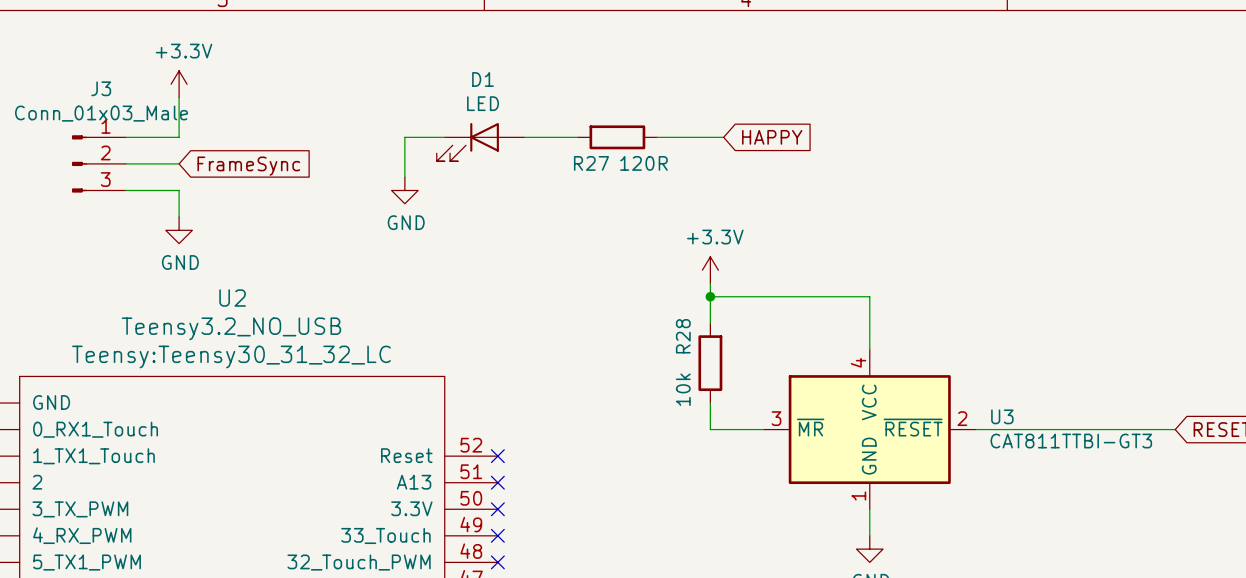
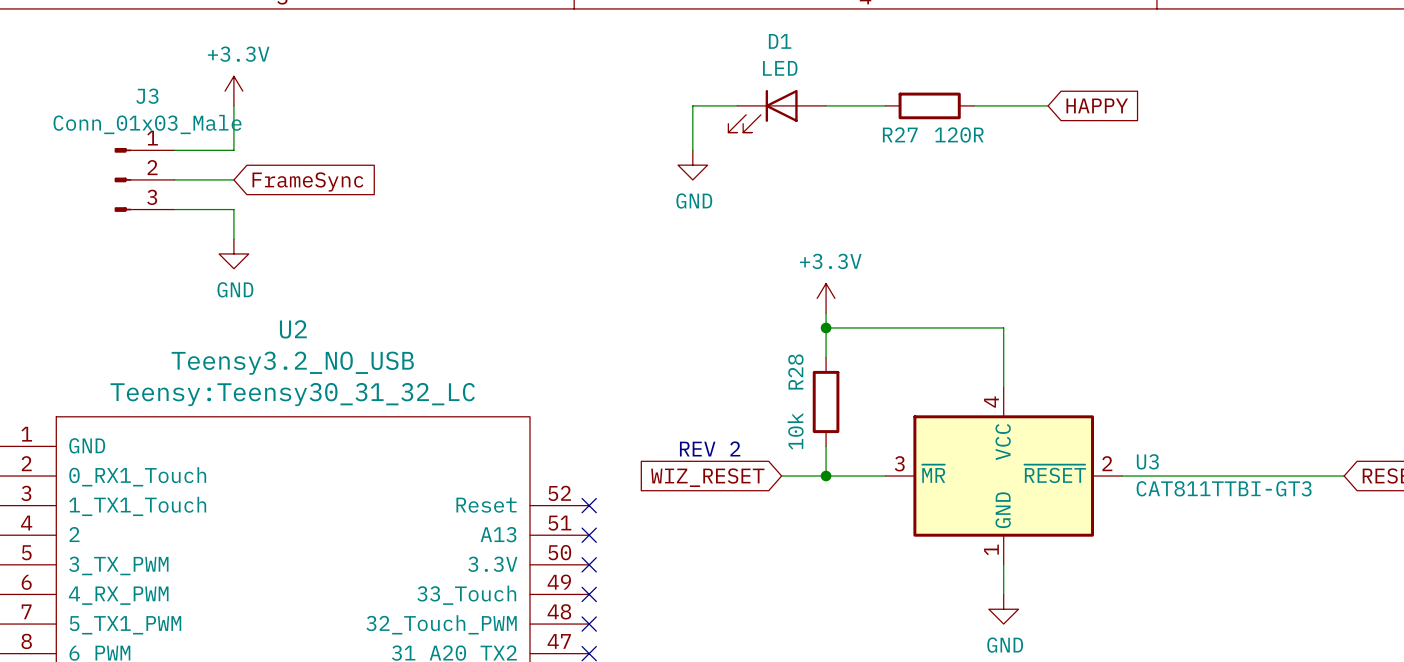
wire: (444, 137) (404, 137) (404, 177) -> (737, 105) (692, 105) (692, 150)
wire: (524, 137) (577, 137) -> (826, 105) (885, 105)
R27 position: (617, 137) -> (929, 105)
wire: (657, 137) (723, 137) -> (974, 105) (1048, 105)
global label position: HAPPY (772, 137) -> HAPPY (1097, 105)
D1 position: (480, 142) -> (777, 111)
power symbol position: GND (404, 190) -> GND (692, 165)
text: none -> REV 2 (710, 448)
wire: none -> (781, 476) (826, 476)
junction: none -> (826, 476)
global label: none -> WIZ_RESET (707, 477)

